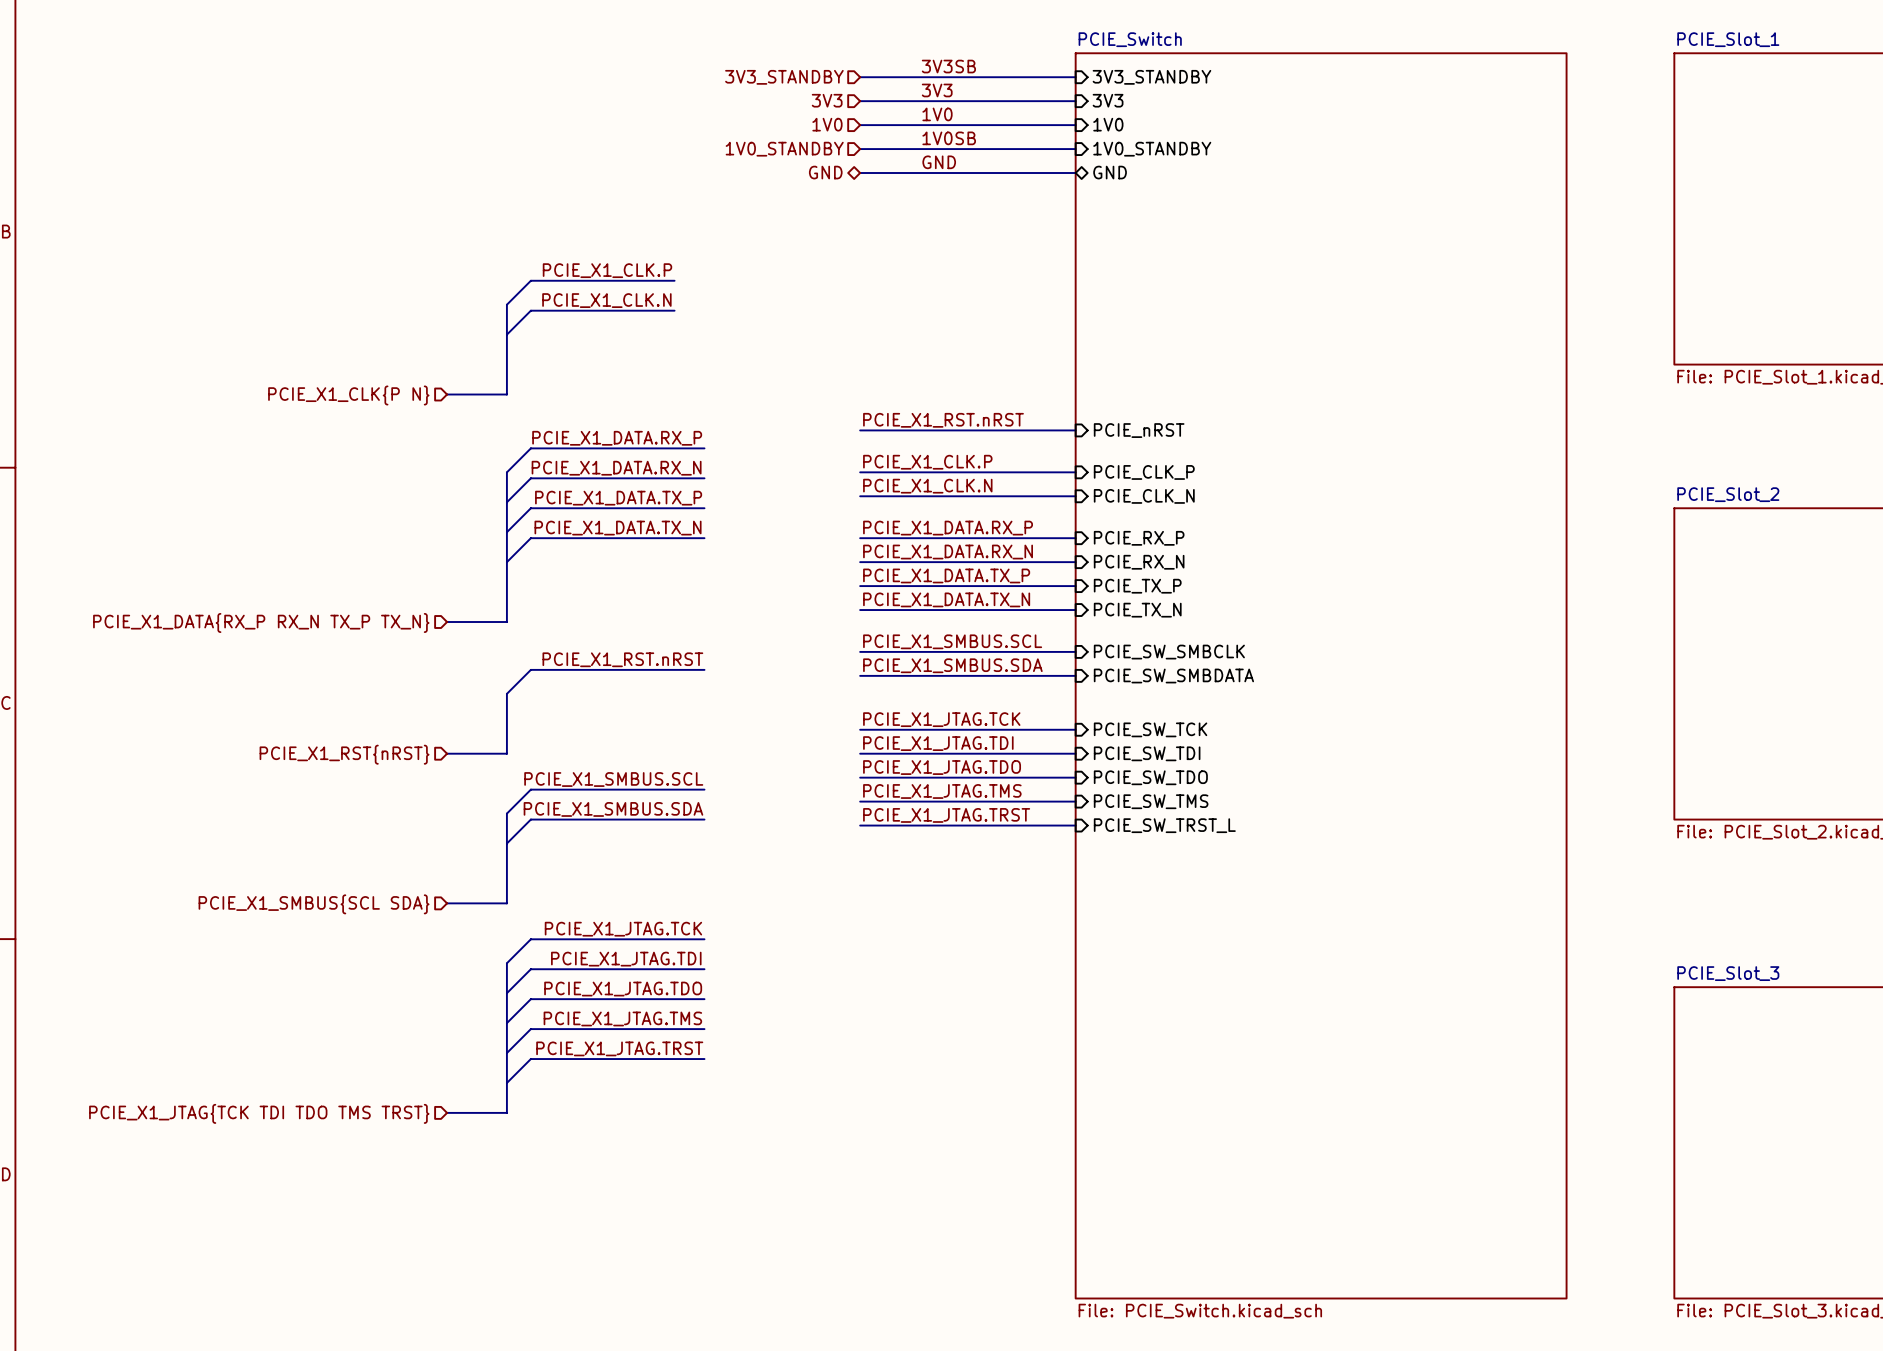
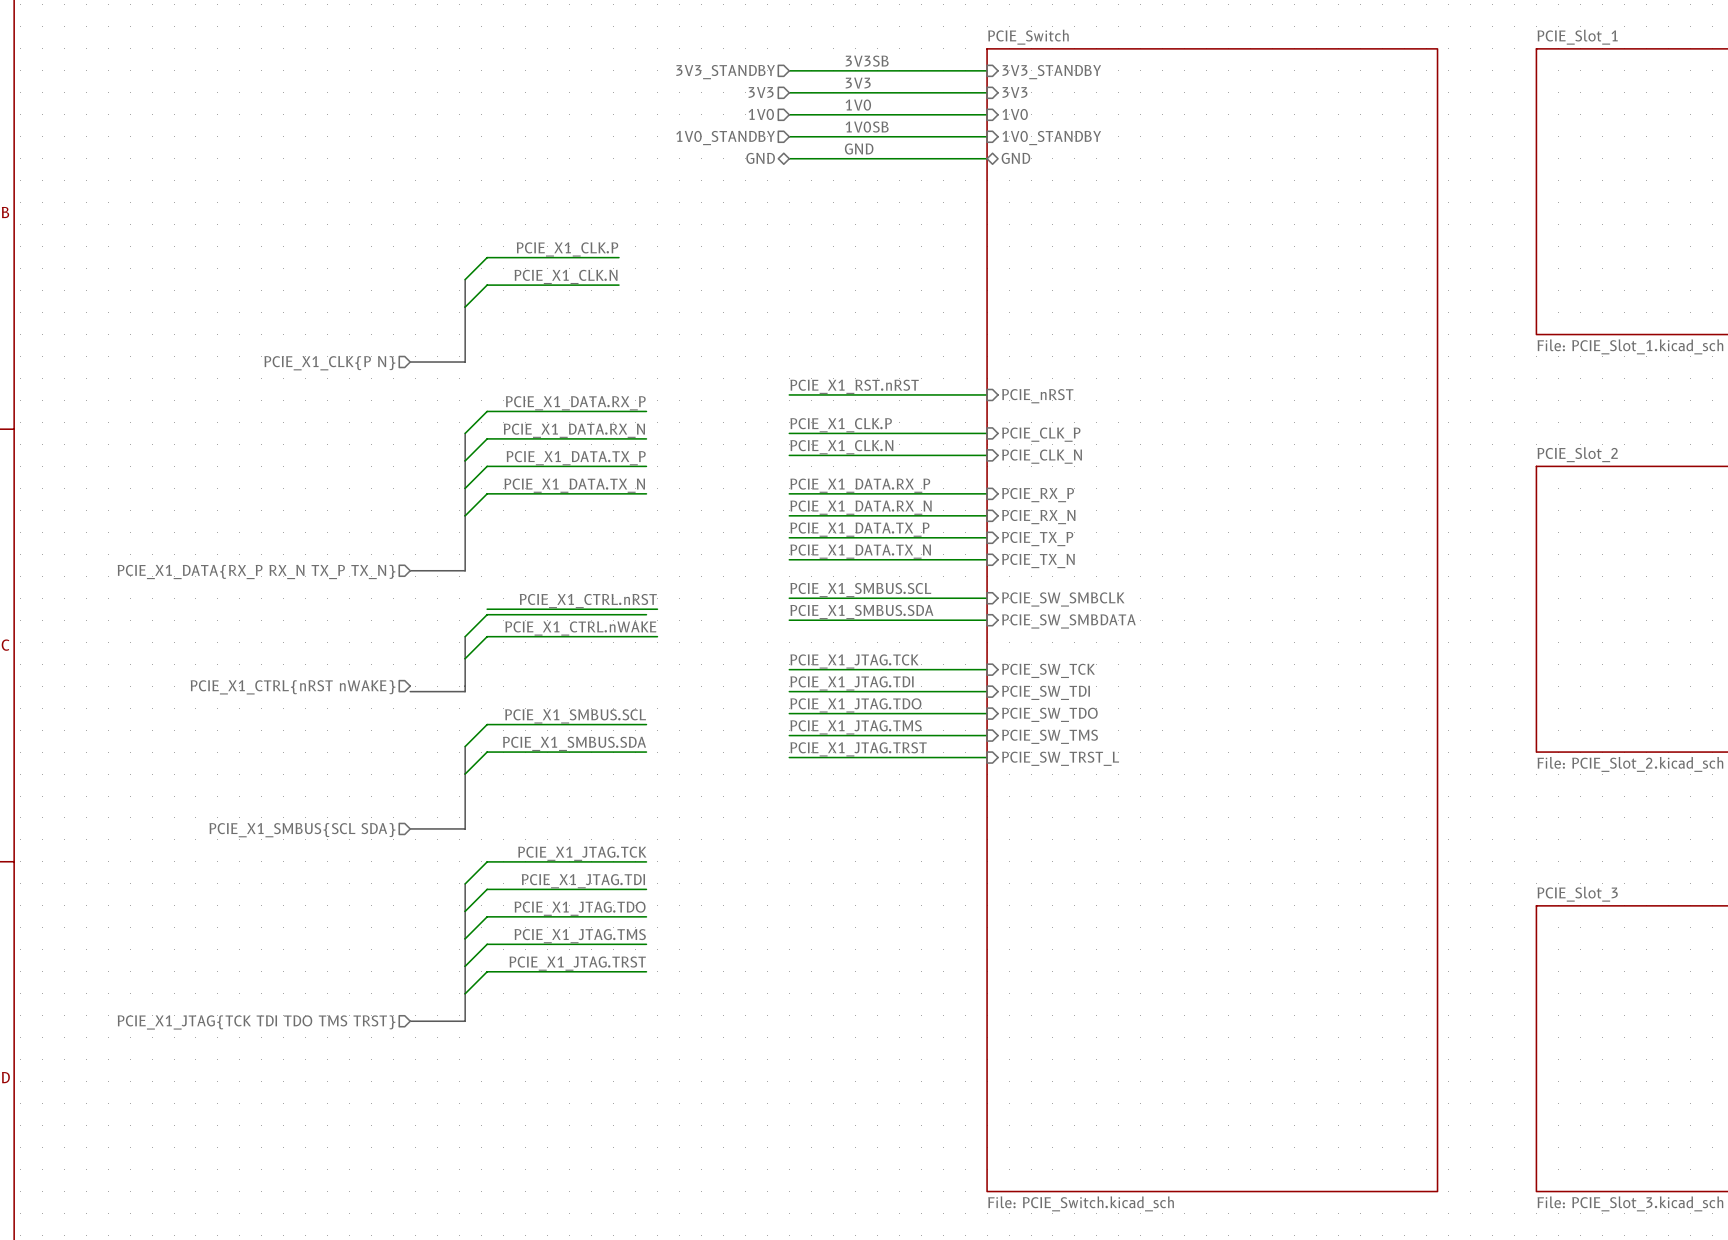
label: none -> PCIE_X1_CTRL.nRST (588, 601)
label: PCIE_X1_RST.nRST (622, 659) -> none
wire: none -> (487, 609) (657, 609)
label: none -> PCIE_X1_CTRL.nWAKE (580, 628)
wire: none -> (487, 636) (657, 636)
wire: none -> (487, 636) (465, 658)
hierarchical label: PCIE_X1_RST{nRST} (344, 754) -> PCIE_X1_CTRL{nRST nWAKE} (293, 687)

